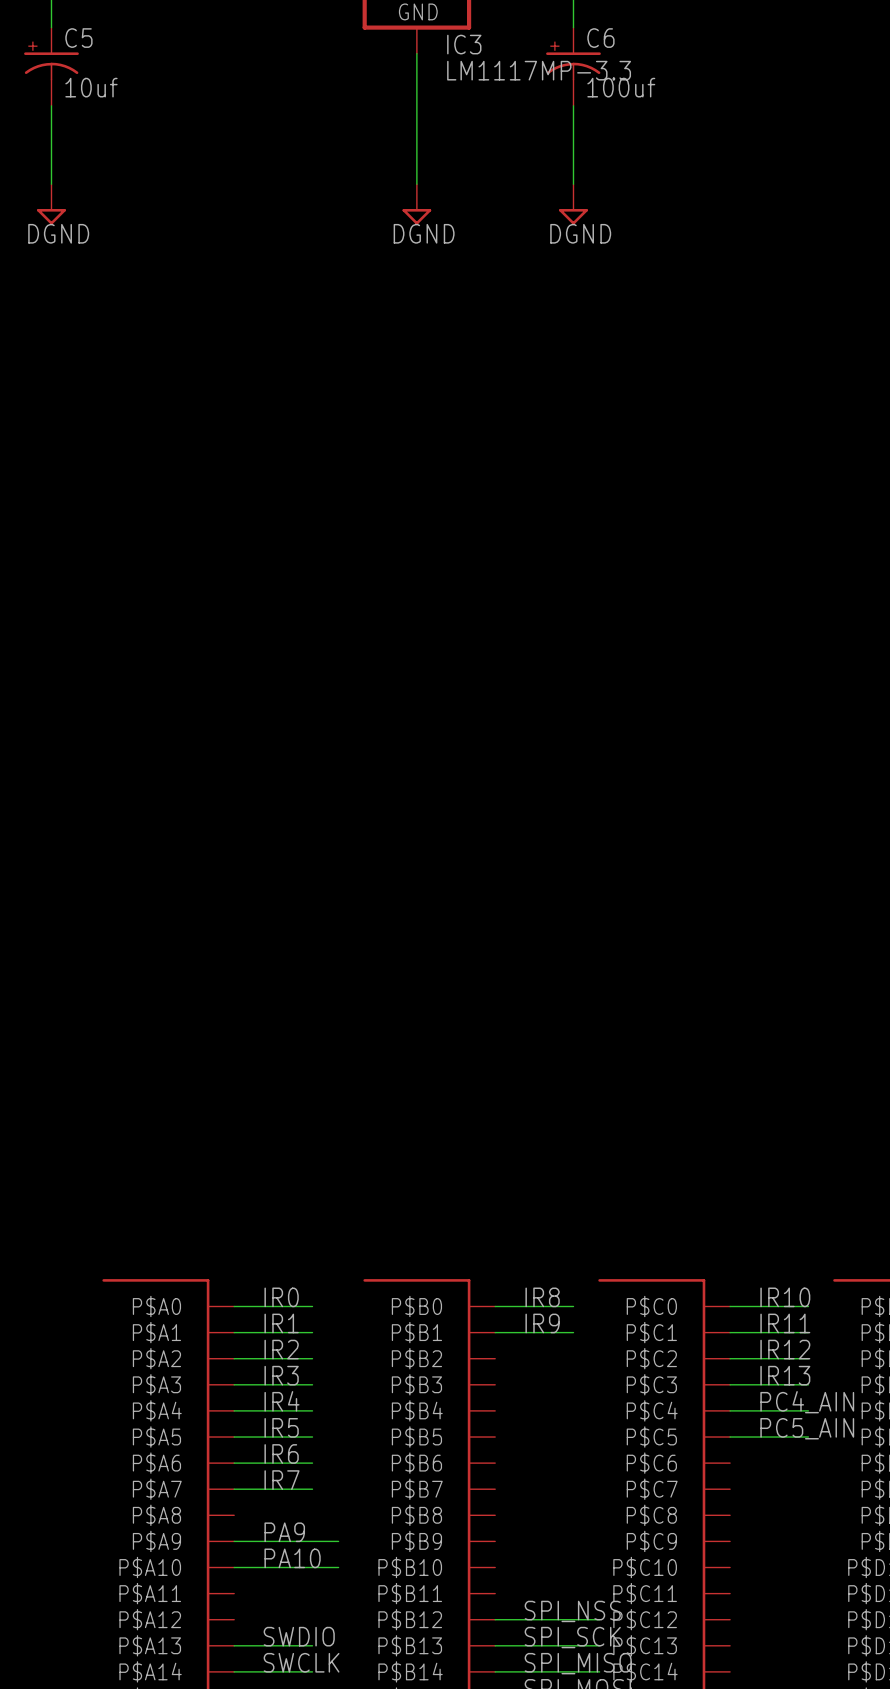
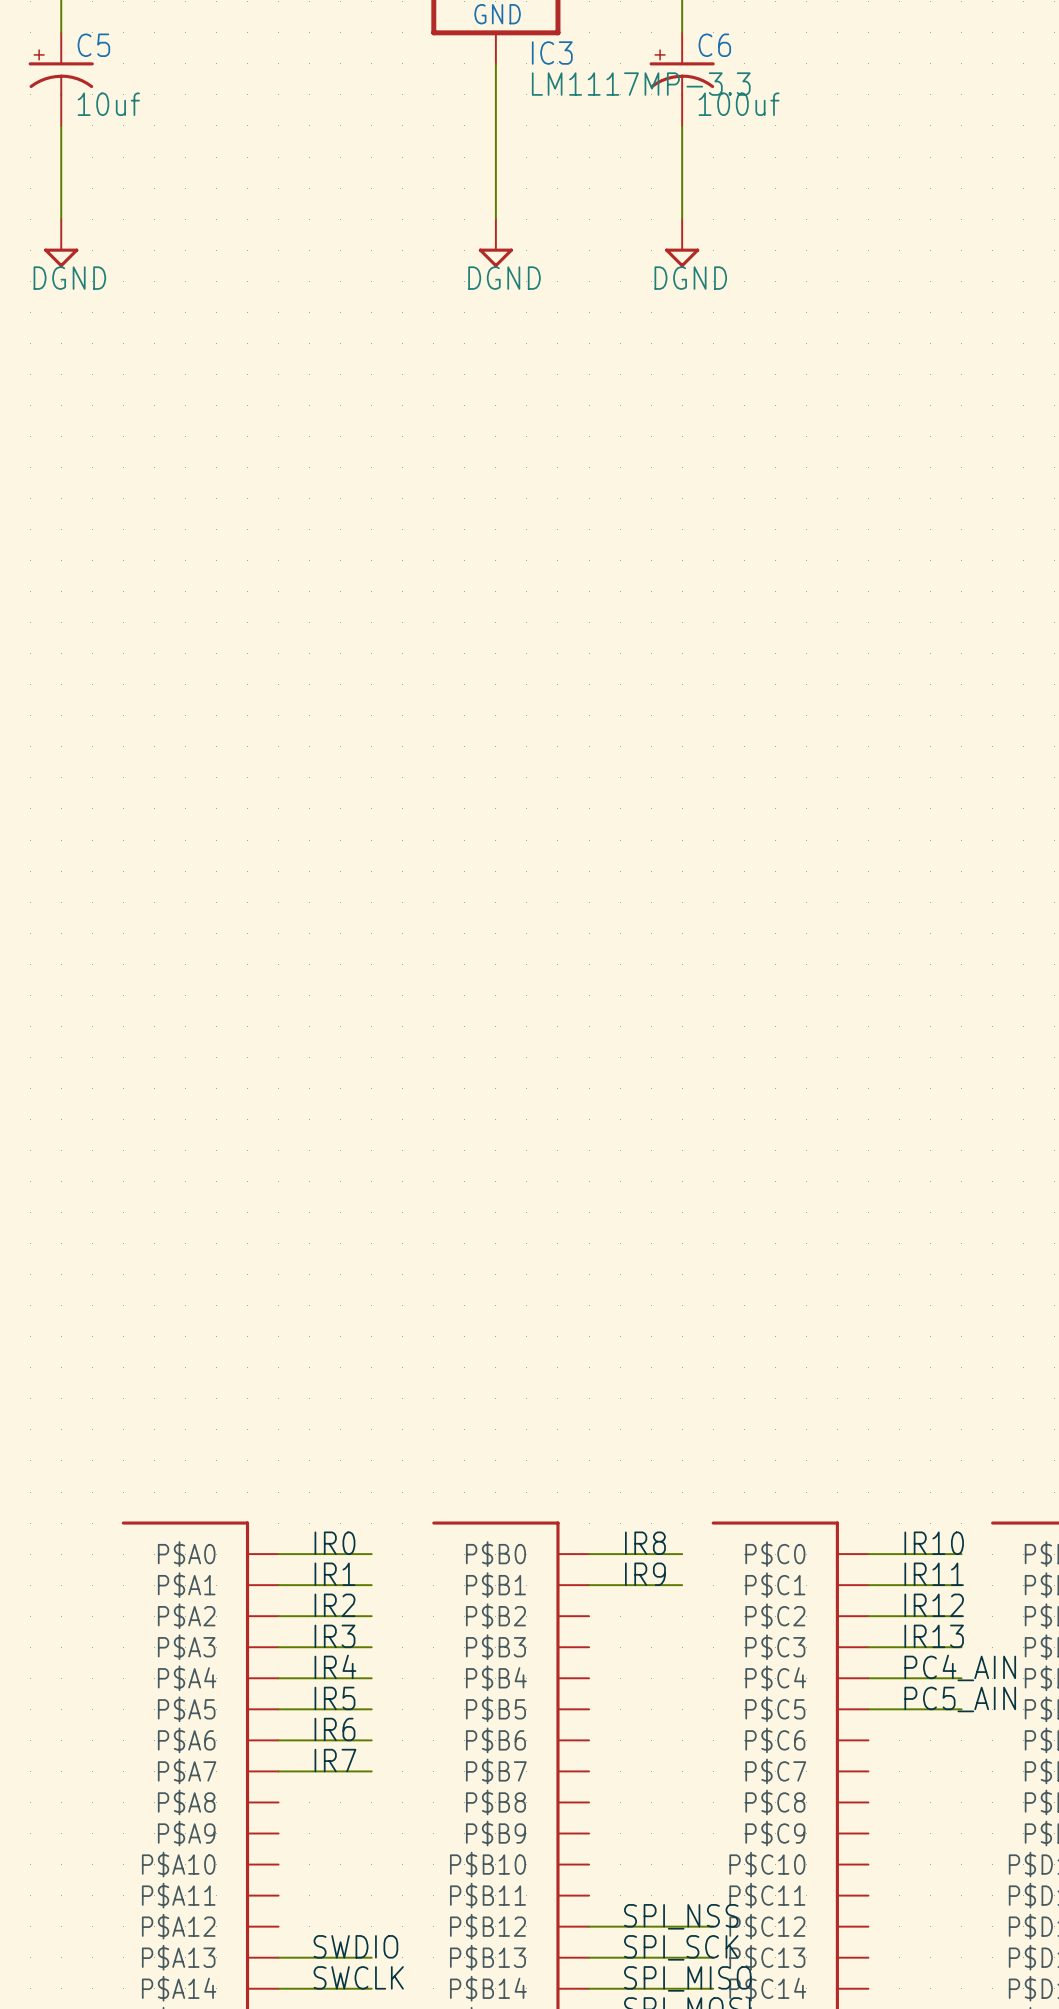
label: PA9 (284, 1532) -> none
wire: (234, 1541) (338, 1541) -> none
label: PA10 (292, 1558) -> none
wire: (234, 1567) (338, 1567) -> none

